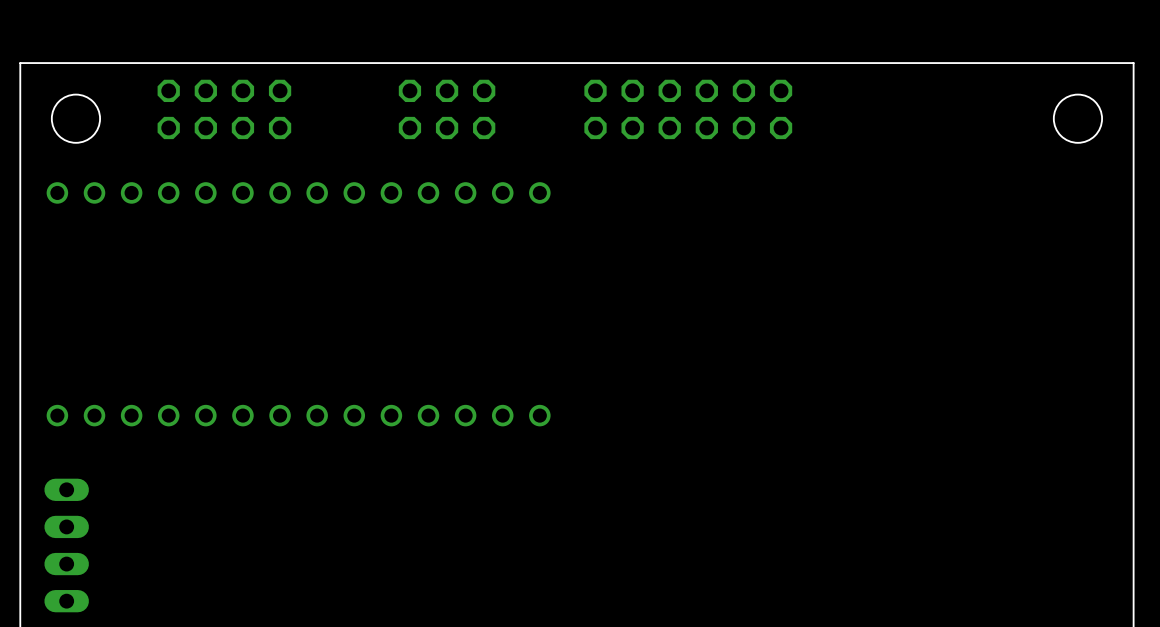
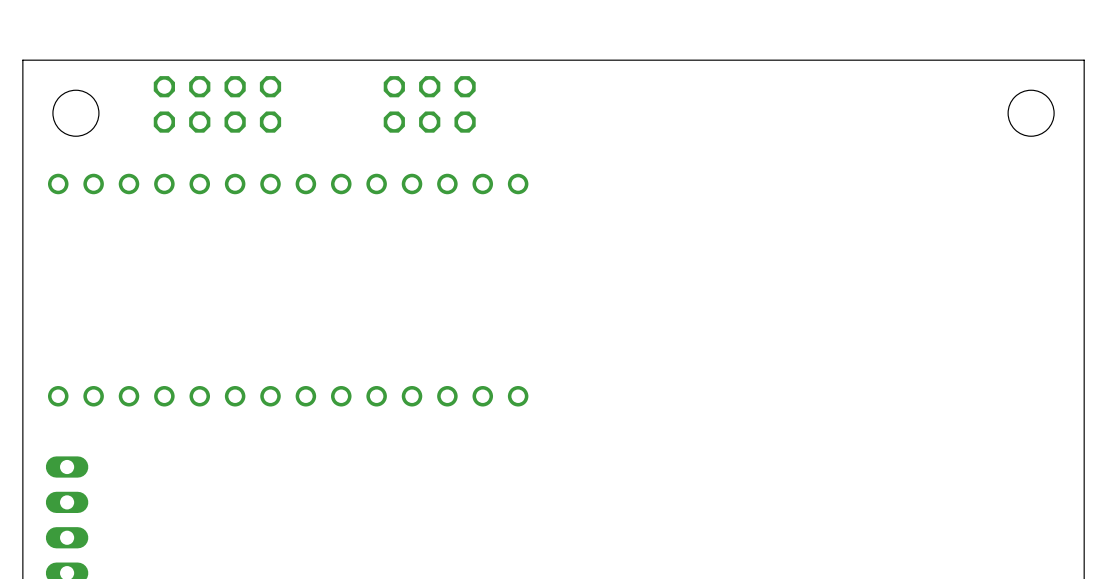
part: (688, 109) -> none

